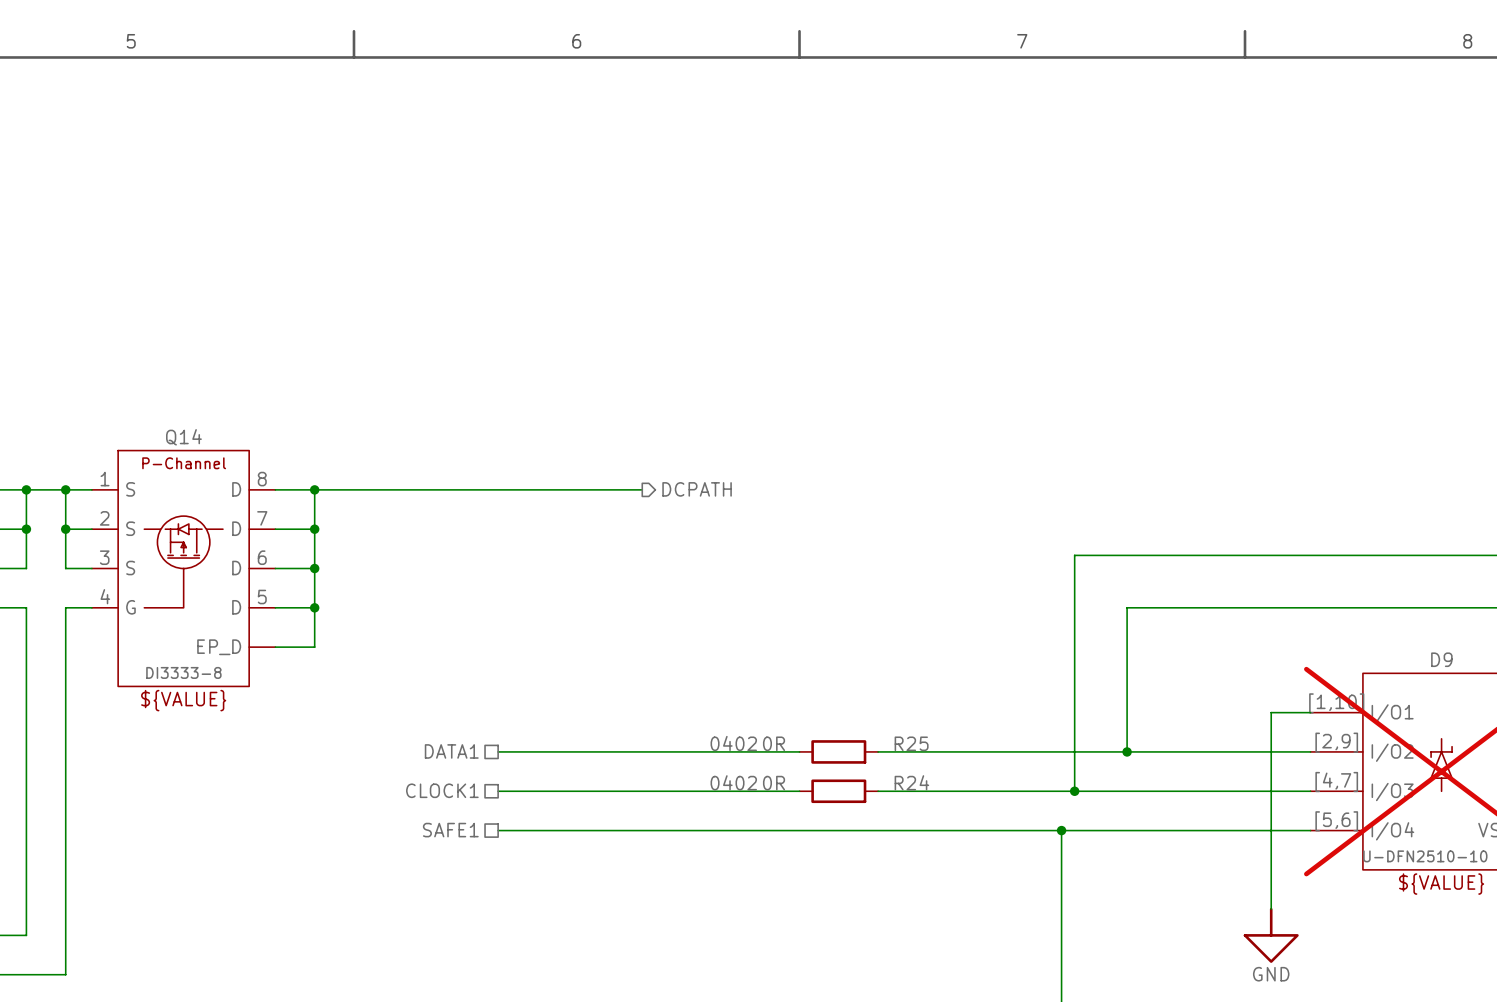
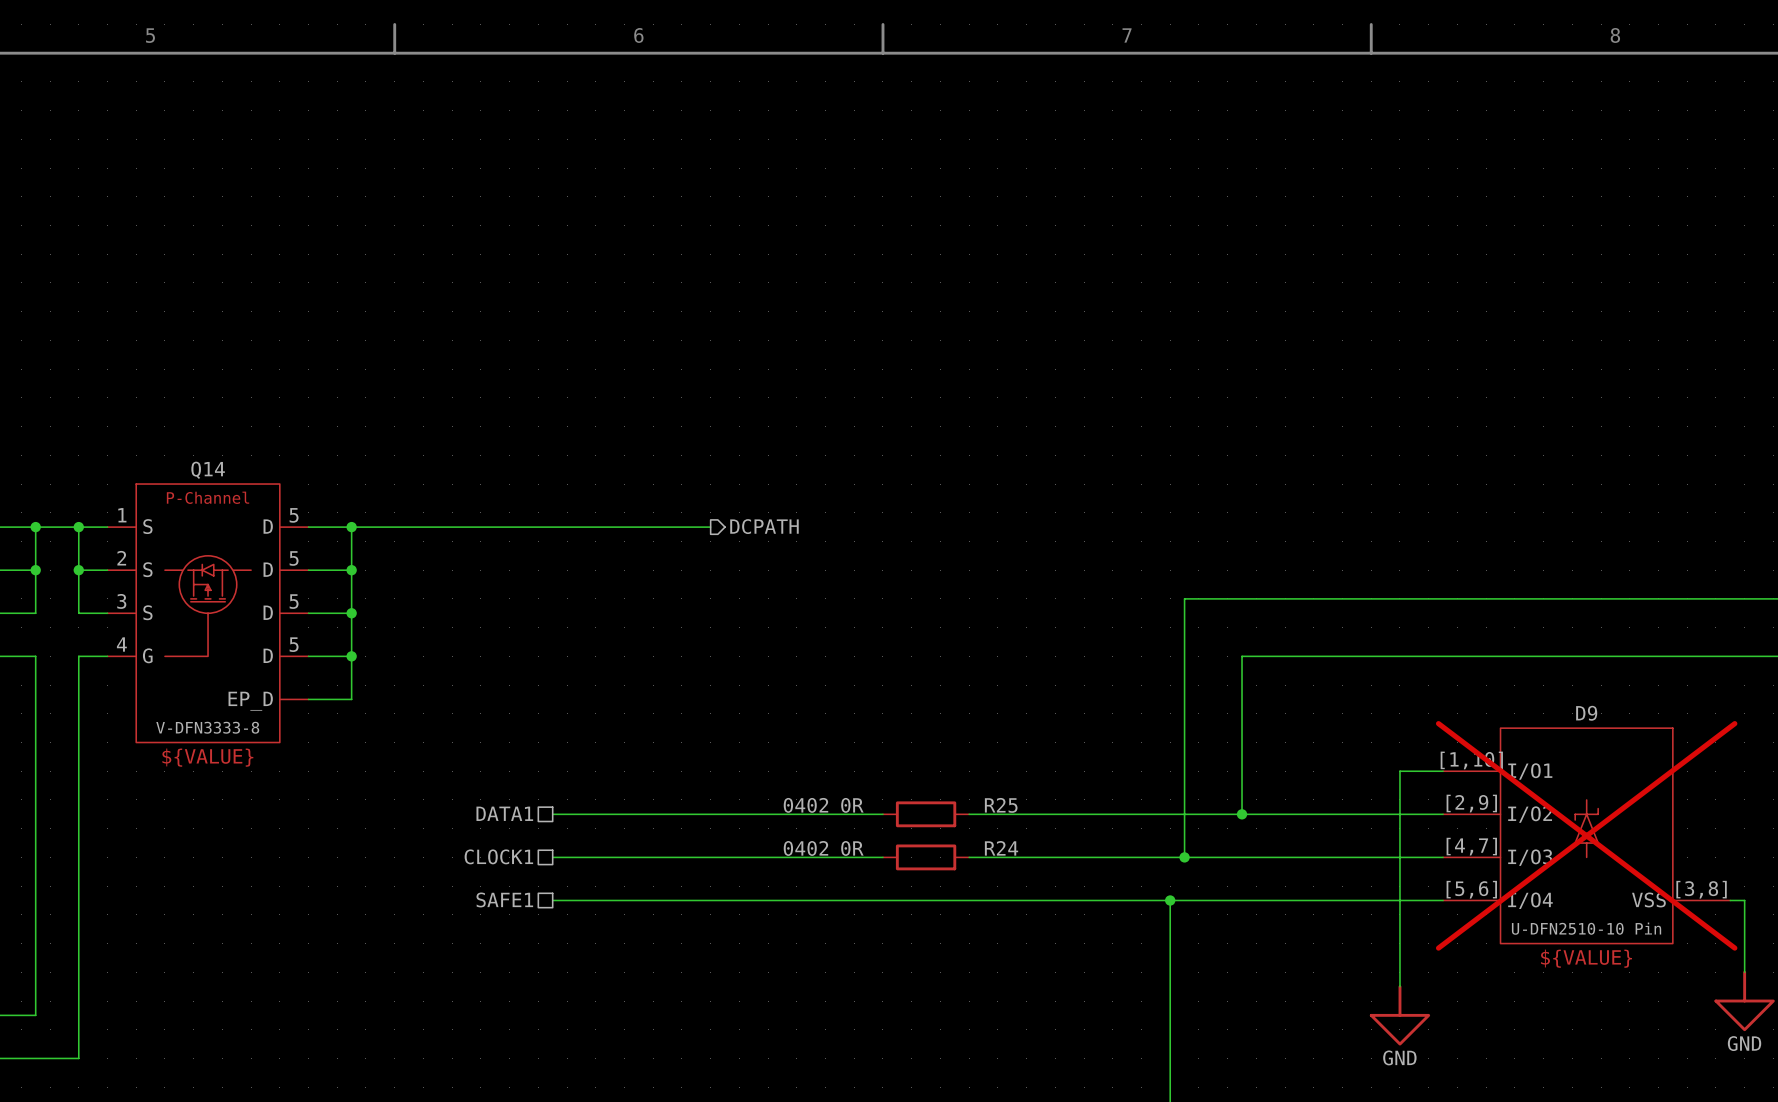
Q14 pin number: 8 (262, 479) -> 5 (294, 515)
Q14 pin number: 7 (262, 518) -> 5 (294, 558)
Q14 pin number: 6 (262, 557) -> 5 (294, 601)
Q14 text: DI3333-8 (183, 672) -> V-DFN3333-8 (207, 727)

